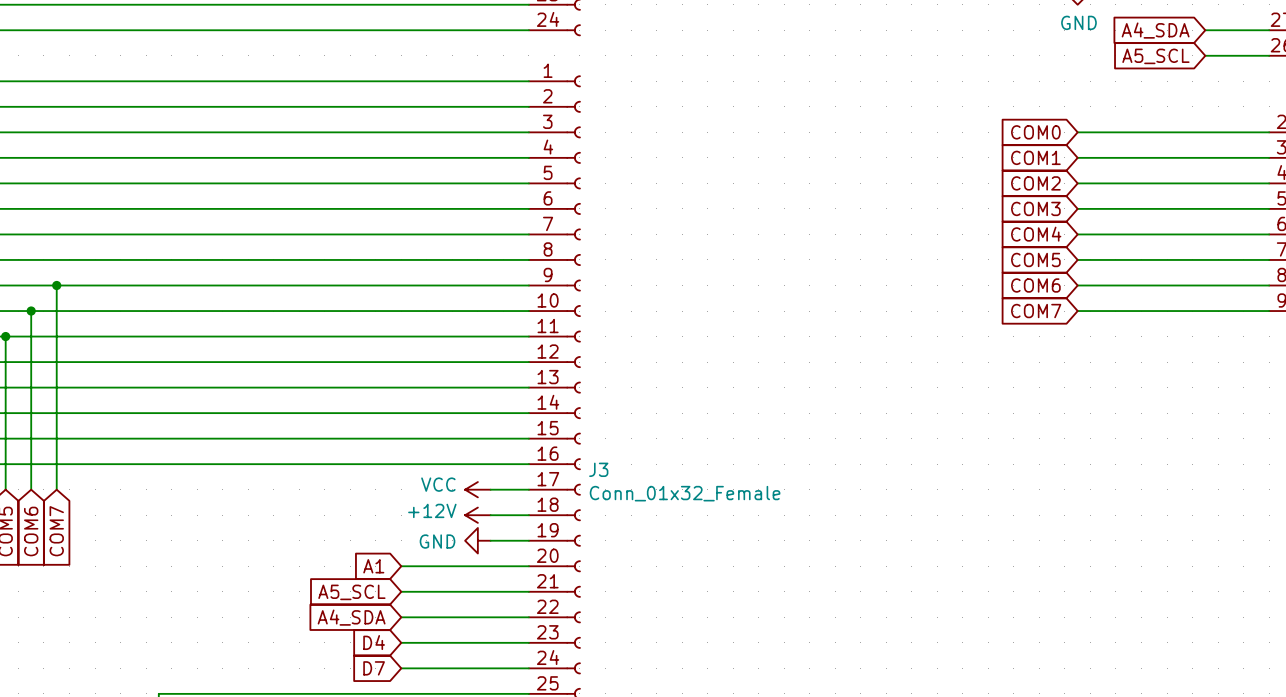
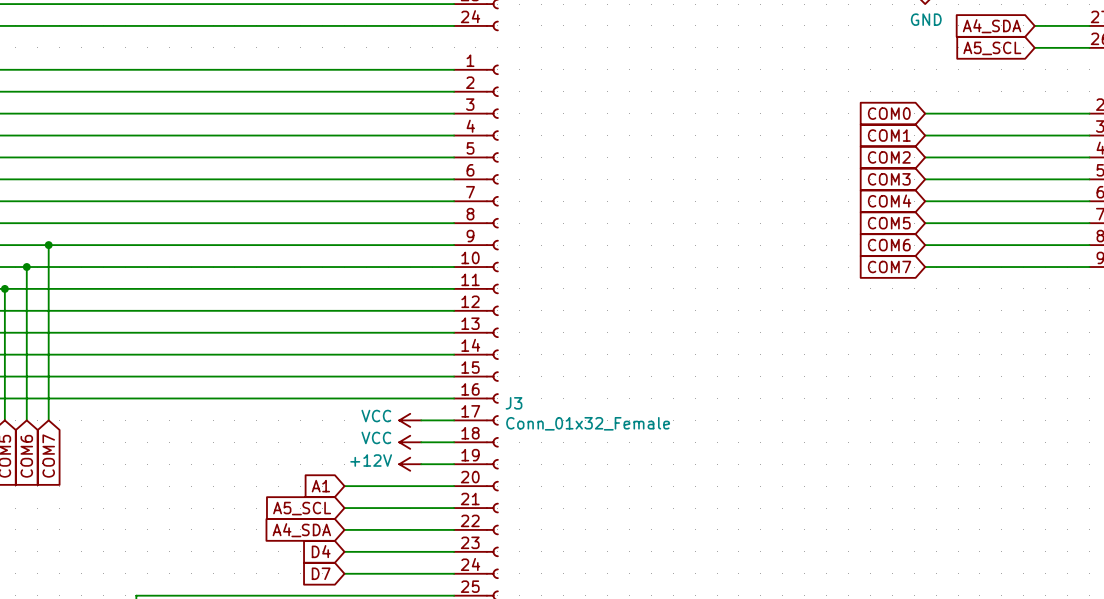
power symbol: +12V (477, 515) -> VCC (410, 442)
power symbol: GND (477, 540) -> +12V (410, 464)

